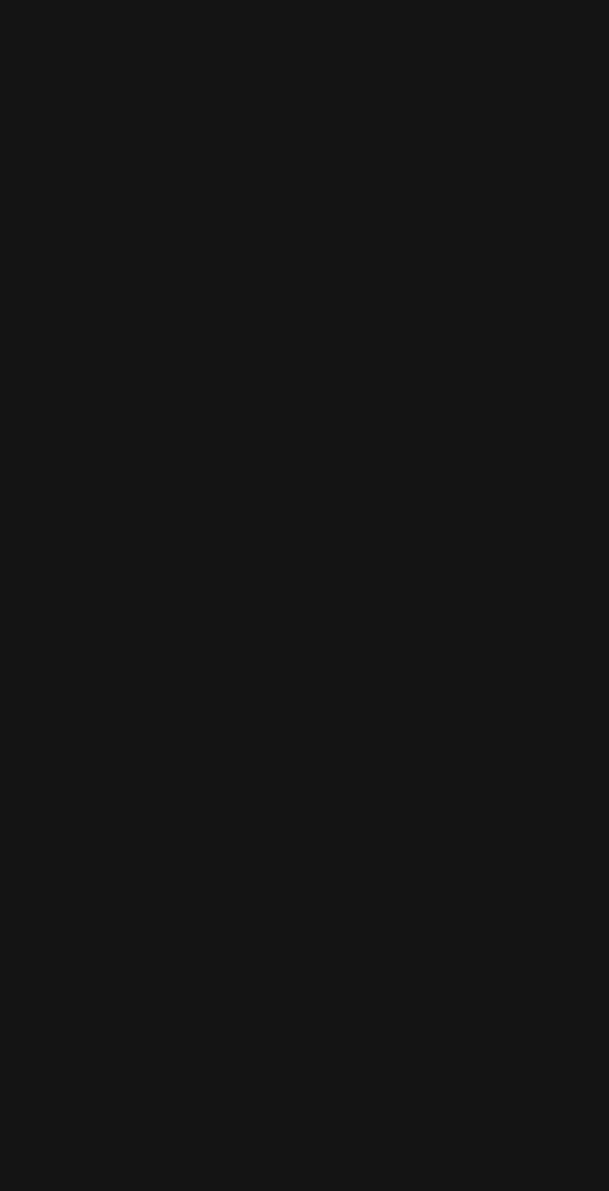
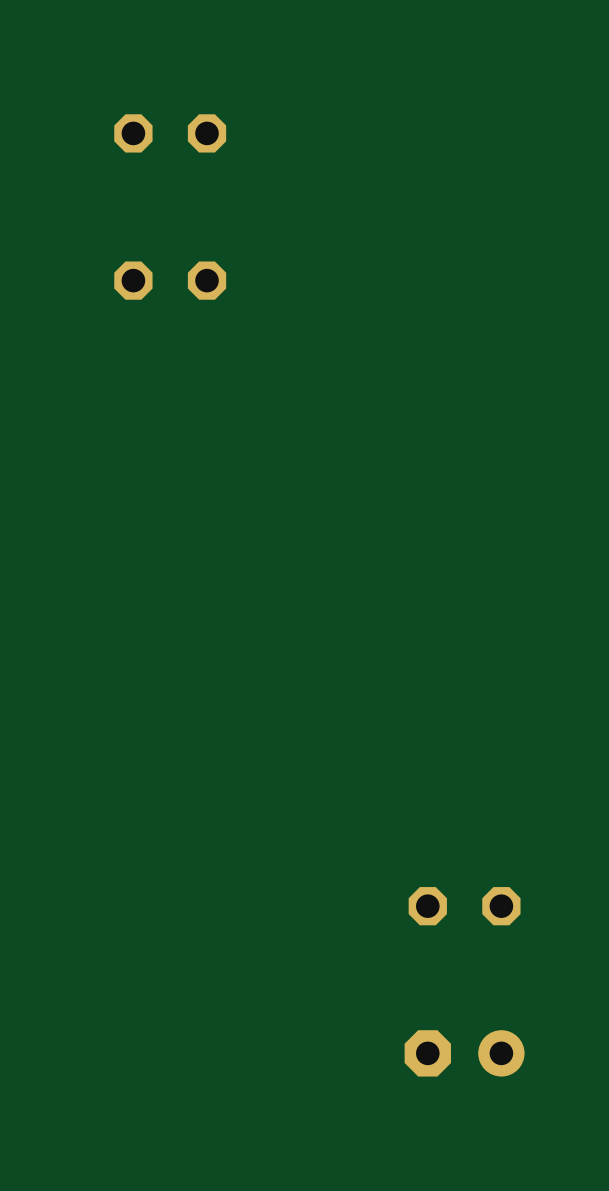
part: none -> (170, 133)
part: none -> (170, 280)
part: none -> (464, 906)
part: none -> (464, 1053)

